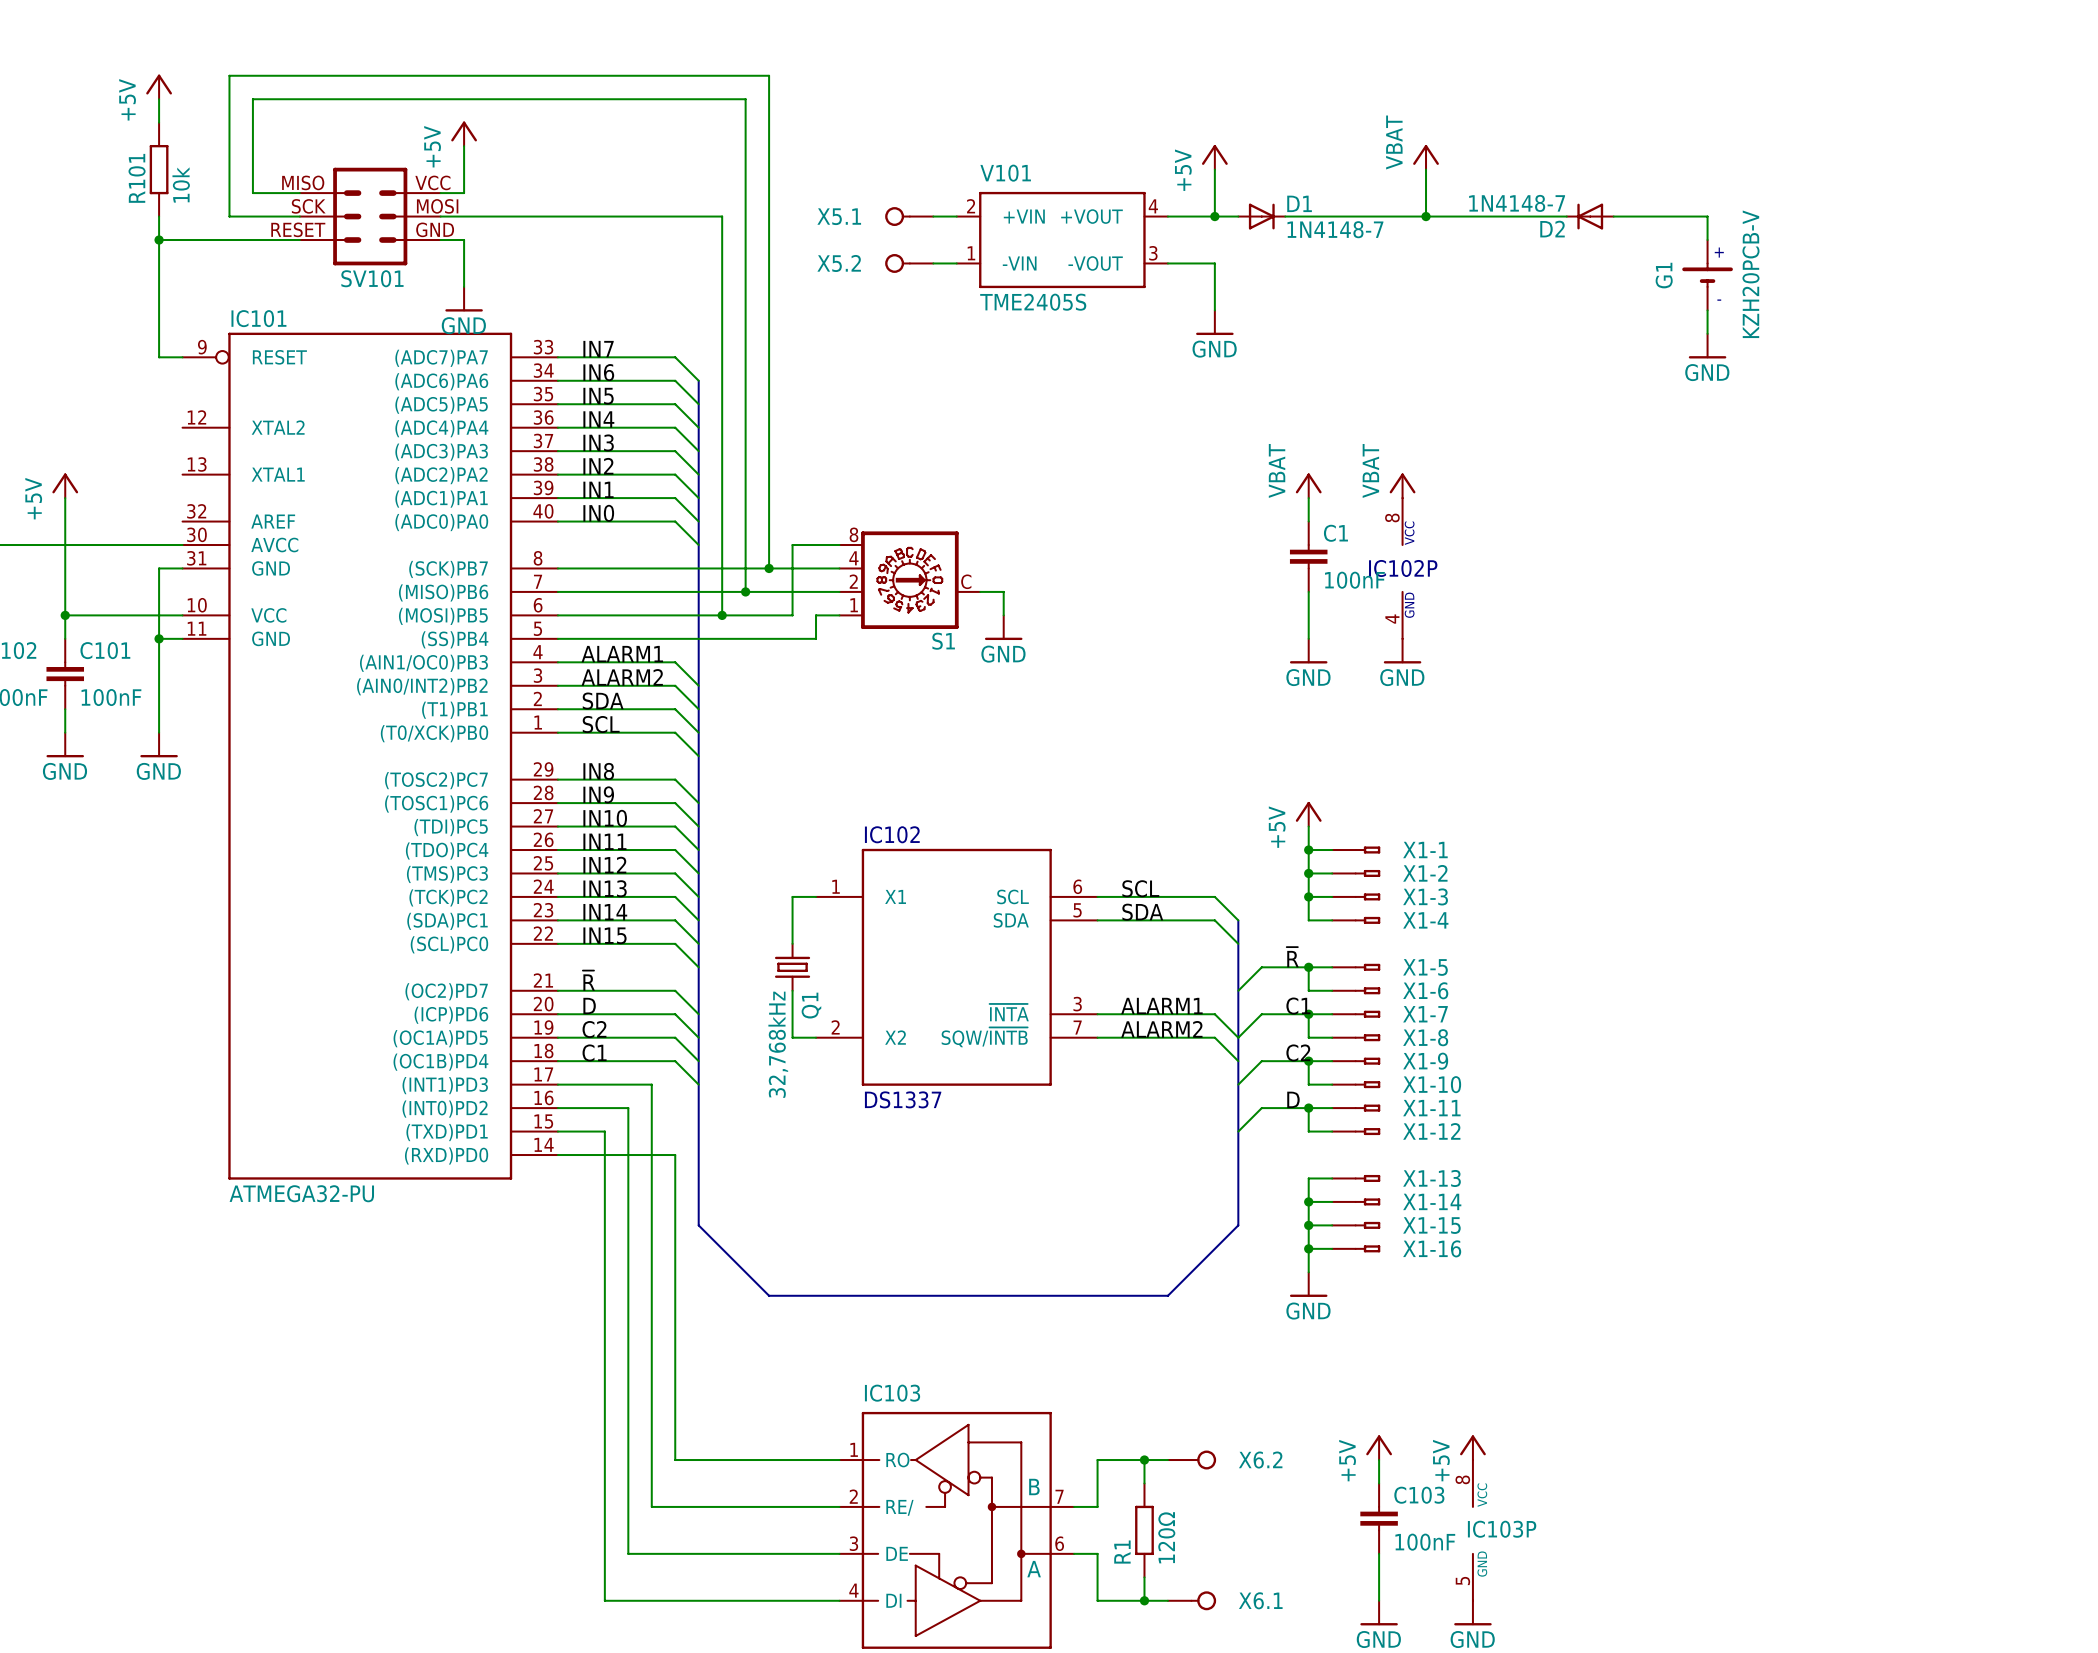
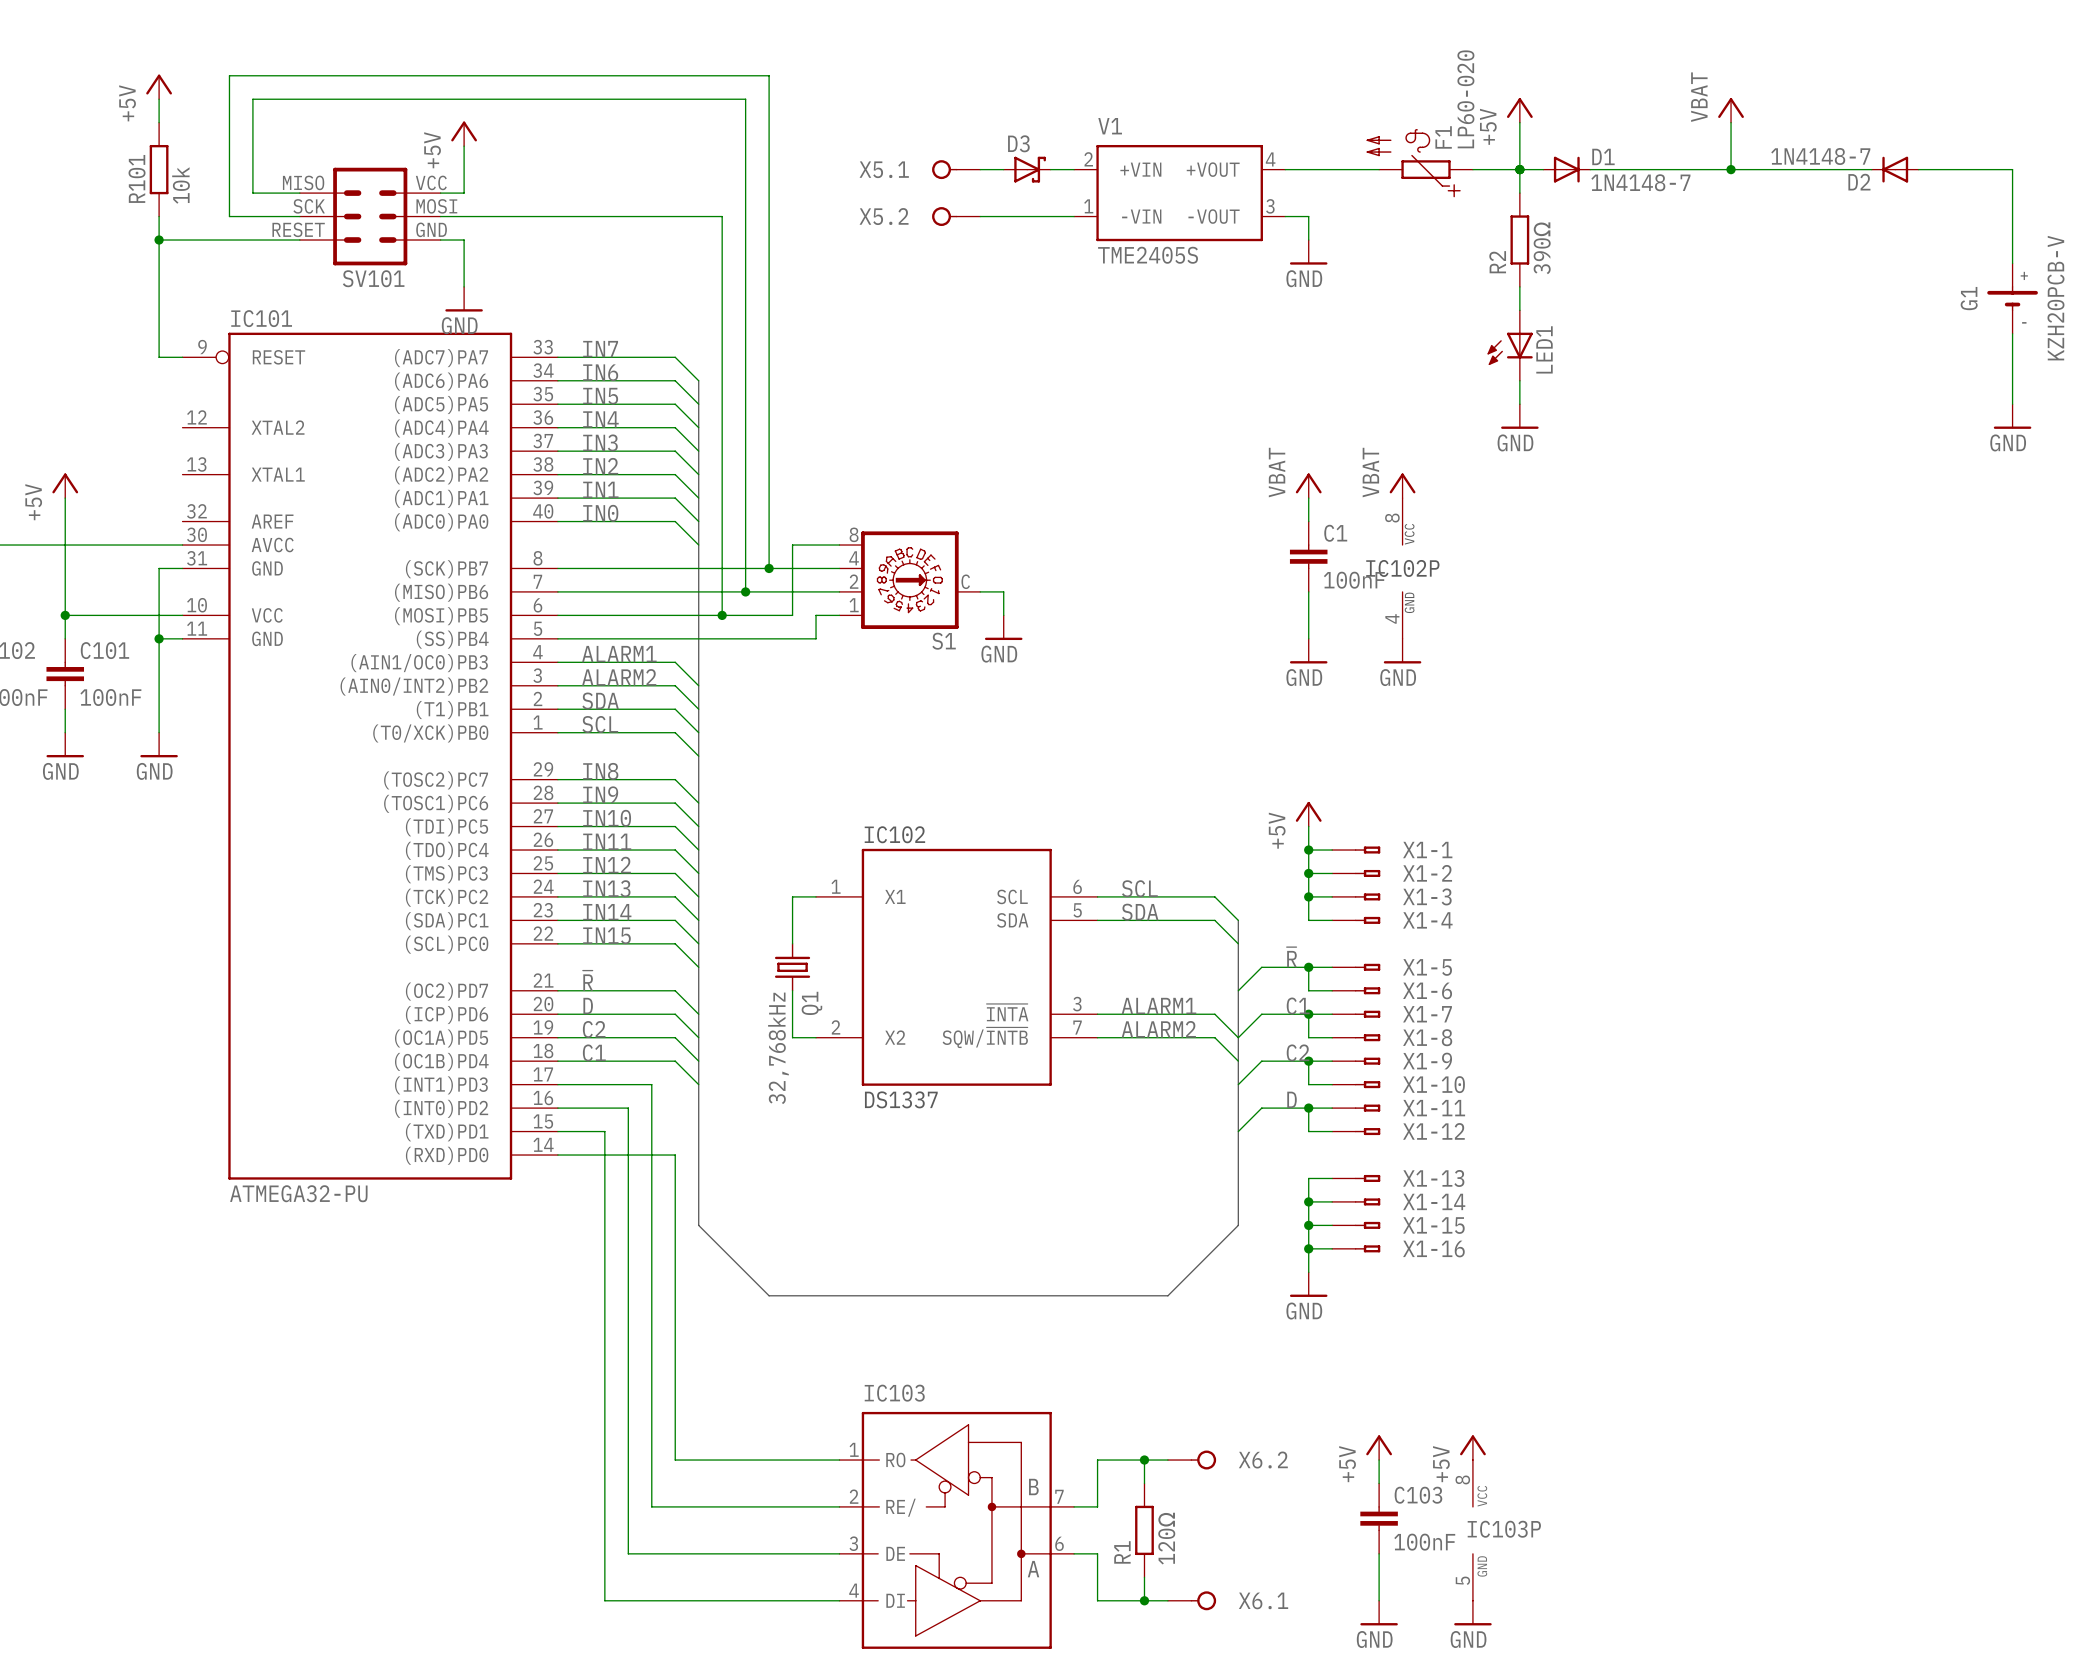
power symbol: none -> +5V (1519, 110)
power symbol: none -> VBAT (1731, 110)
wire: none -> (1519, 122) (1519, 193)
wire: none -> (1731, 122) (1731, 169)
power symbol: +5V (1214, 157) -> none
power symbol: VBAT (1426, 157) -> none
F1: none -> LP60-020 (1419, 163)
D3: none -> (1027, 169)
wire: (1214, 169) (1214, 216) -> none
wire: none -> (1285, 169) (1379, 169)
wire: (1426, 169) (1426, 216) -> none
wire: none -> (1472, 169) (1543, 169)
junction: none -> (1519, 169)
wire: none -> (1590, 169) (1871, 169)
junction: none -> (1731, 169)
wire: none -> (1918, 169) (2012, 169) (2012, 263)
V1: none -> TME2405S (1179, 193)
X5.1 position: (909, 216) -> (956, 169)
wire: (933, 216) (956, 216) -> (980, 169) (1003, 169)
wire: none -> (980, 216) (1074, 216)
wire: (1167, 216) (1238, 216) -> none
junction: (1214, 216) -> none
D1 position: (1261, 216) -> (1566, 169)
wire: (1308, 216) (1566, 216) -> (1308, 216) (1308, 240)
junction: (1426, 216) -> none
D2 position: (1590, 216) -> (1895, 169)
wire: (1613, 216) (1707, 216) (1707, 240) -> none
V101: TME2405S (1062, 240) -> none
R2: none -> 390Ω (1519, 240)
X5.2 position: (909, 263) -> (956, 216)
wire: (933, 263) (956, 263) -> (1050, 169) (1074, 169)
wire: (1167, 263) (1214, 263) (1214, 310) -> none
G1 position: (1707, 275) -> (2012, 298)
wire: (1707, 310) (1707, 333) -> (1519, 286) (1519, 310)
power symbol position: GND (1214, 322) -> GND (1308, 252)
wire: none -> (2012, 333) (2012, 404)
LED1: none -> (1510, 345)
power symbol: GND (1707, 346) -> none
wire: none -> (1519, 380) (1519, 404)
power symbol: none -> GND (1519, 416)
power symbol: none -> GND (2012, 416)

